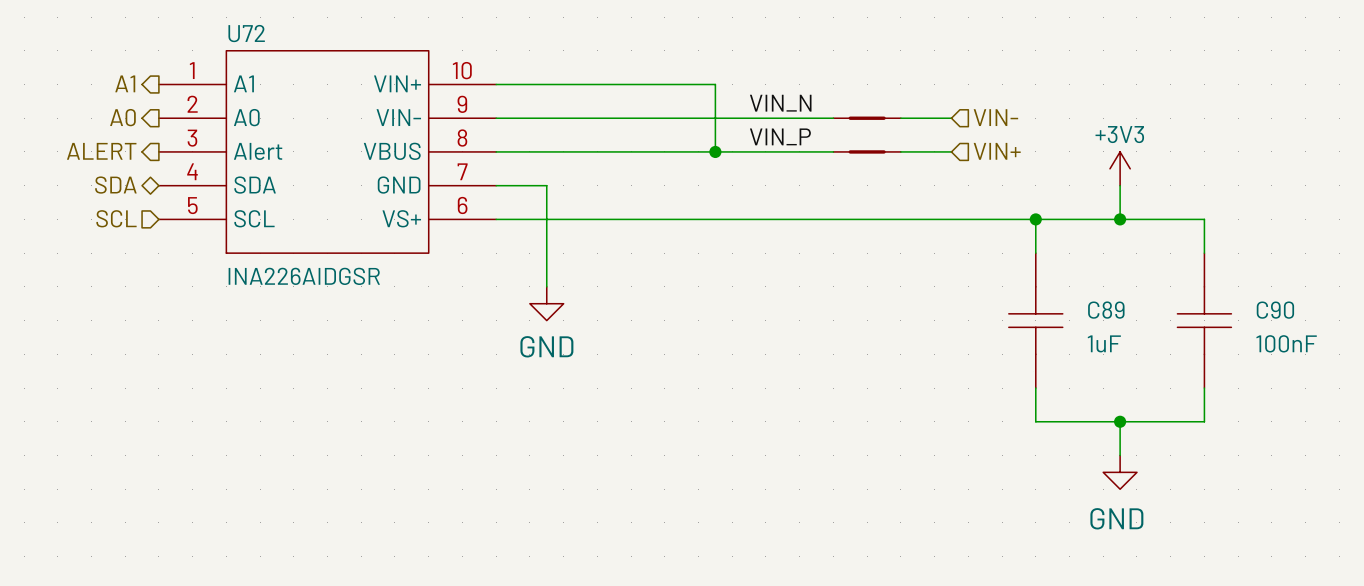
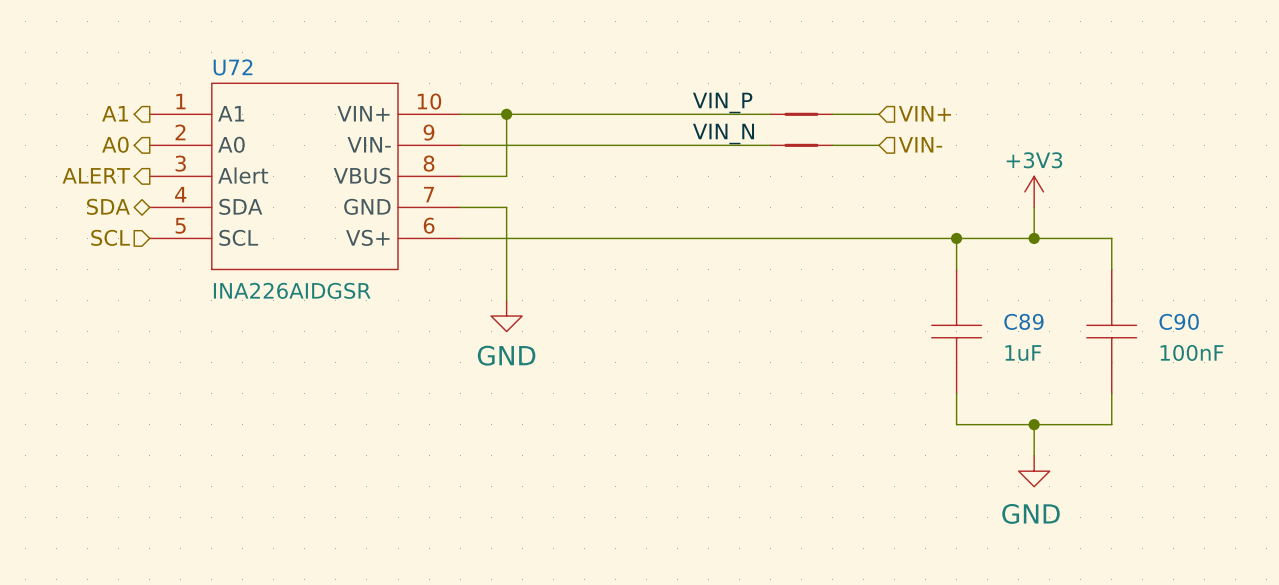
junction: none -> (506, 114)
wire: (715, 84) (715, 151) -> (661, 114) (770, 114)
label position: VIN_P (780, 136) -> VIN_P (722, 102)
wire: (546, 151) (833, 151) -> (506, 176) (506, 114)
junction: (715, 151) -> none
part position: (867, 151) -> (801, 114)
wire: (900, 151) (951, 151) -> (832, 114) (879, 114)
hierarchical label position: VIN+ (997, 151) -> VIN+ (924, 113)

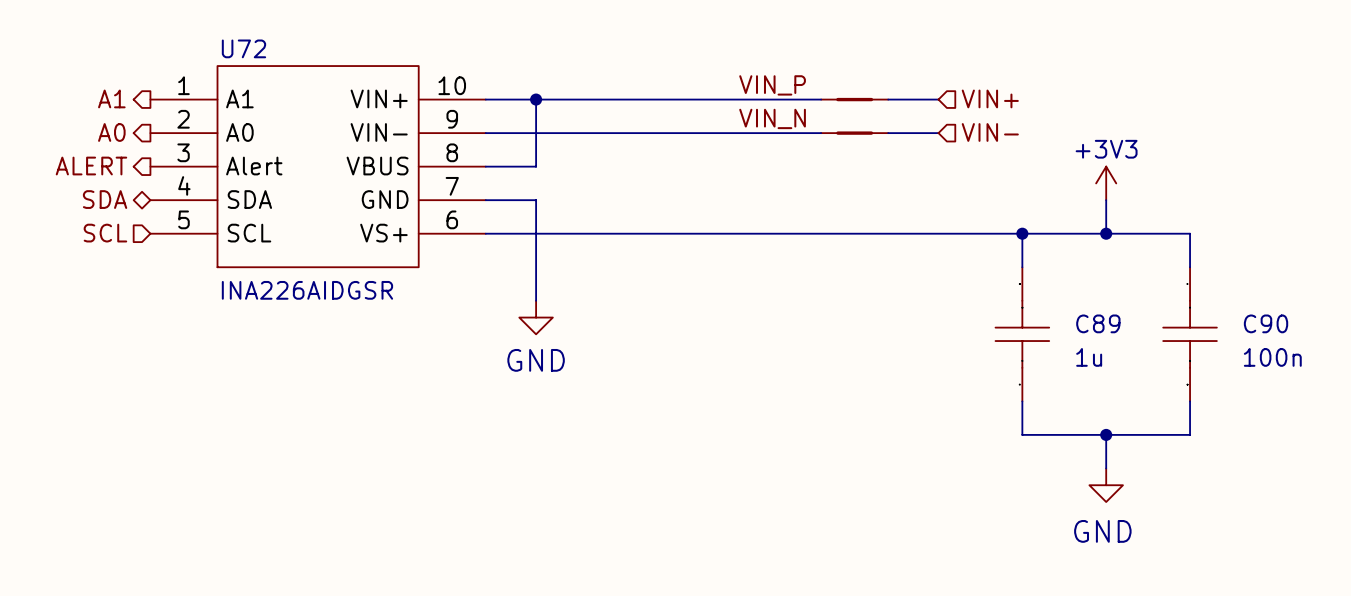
C90 value: 100nF (1192, 352) -> 100n (1272, 357)
C89 value: 1uF (1023, 353) -> 1u (1089, 357)

